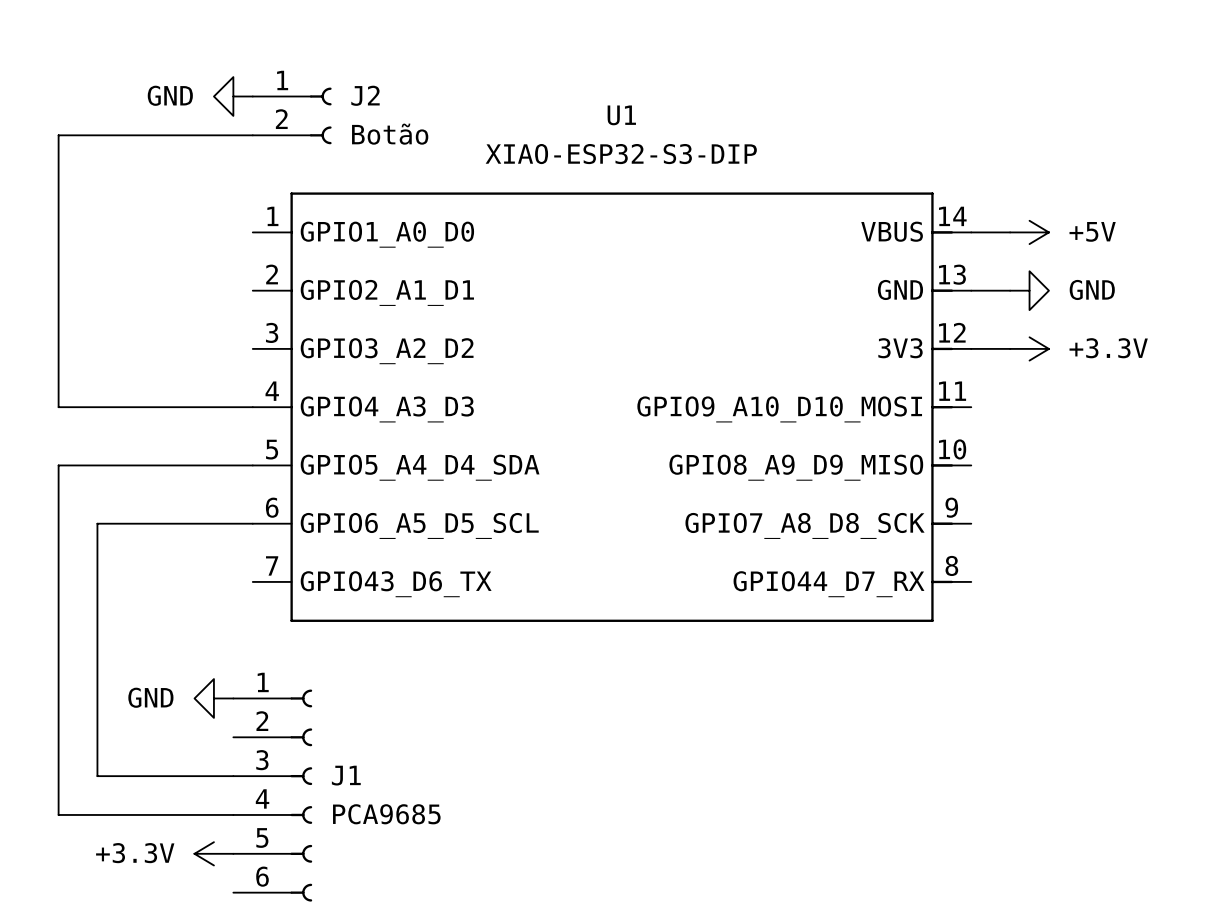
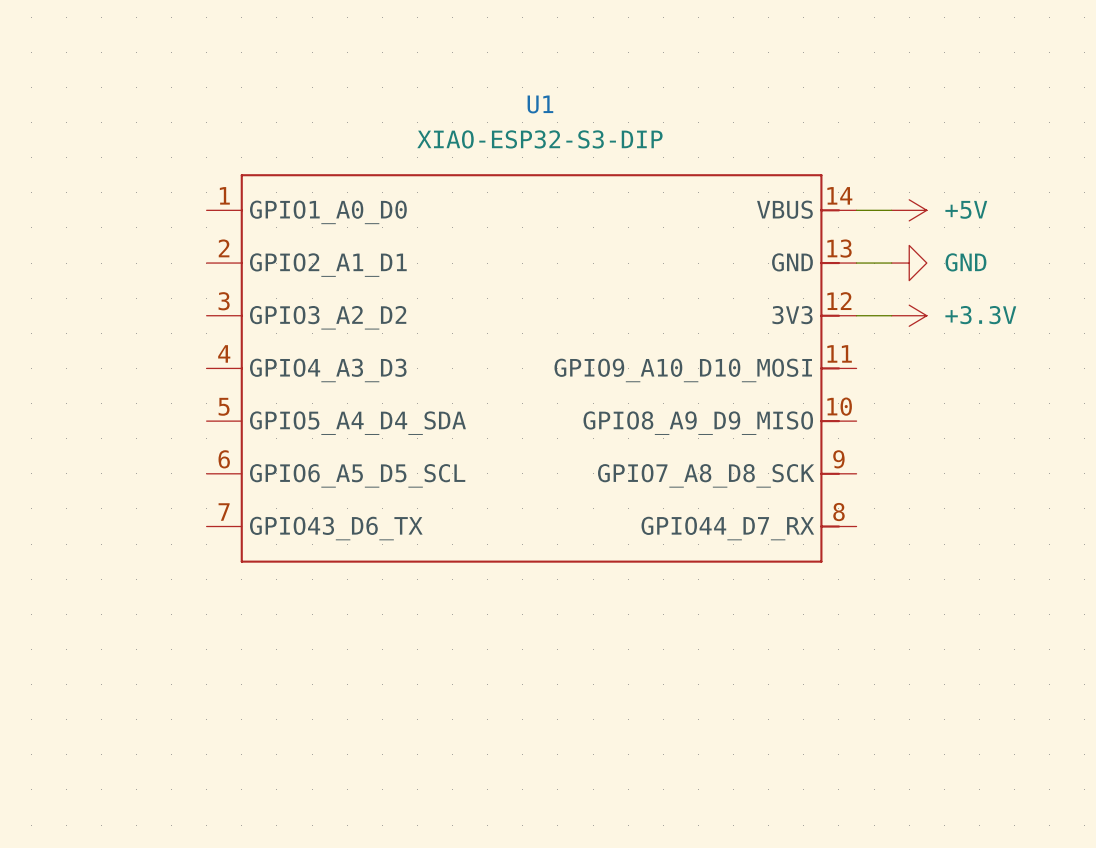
power symbol: GND (233, 96) -> none
J2: Botão (292, 115) -> none
wire: (252, 135) (58, 135) (58, 407) (252, 407) -> none
wire: (252, 465) (58, 465) (58, 814) (233, 814) -> none
wire: (252, 523) (97, 523) (97, 776) (233, 776) -> none
power symbol: GND (213, 698) -> none
J1: PCA9685 (272, 795) -> none
power symbol: +3.3V (213, 853) -> none

